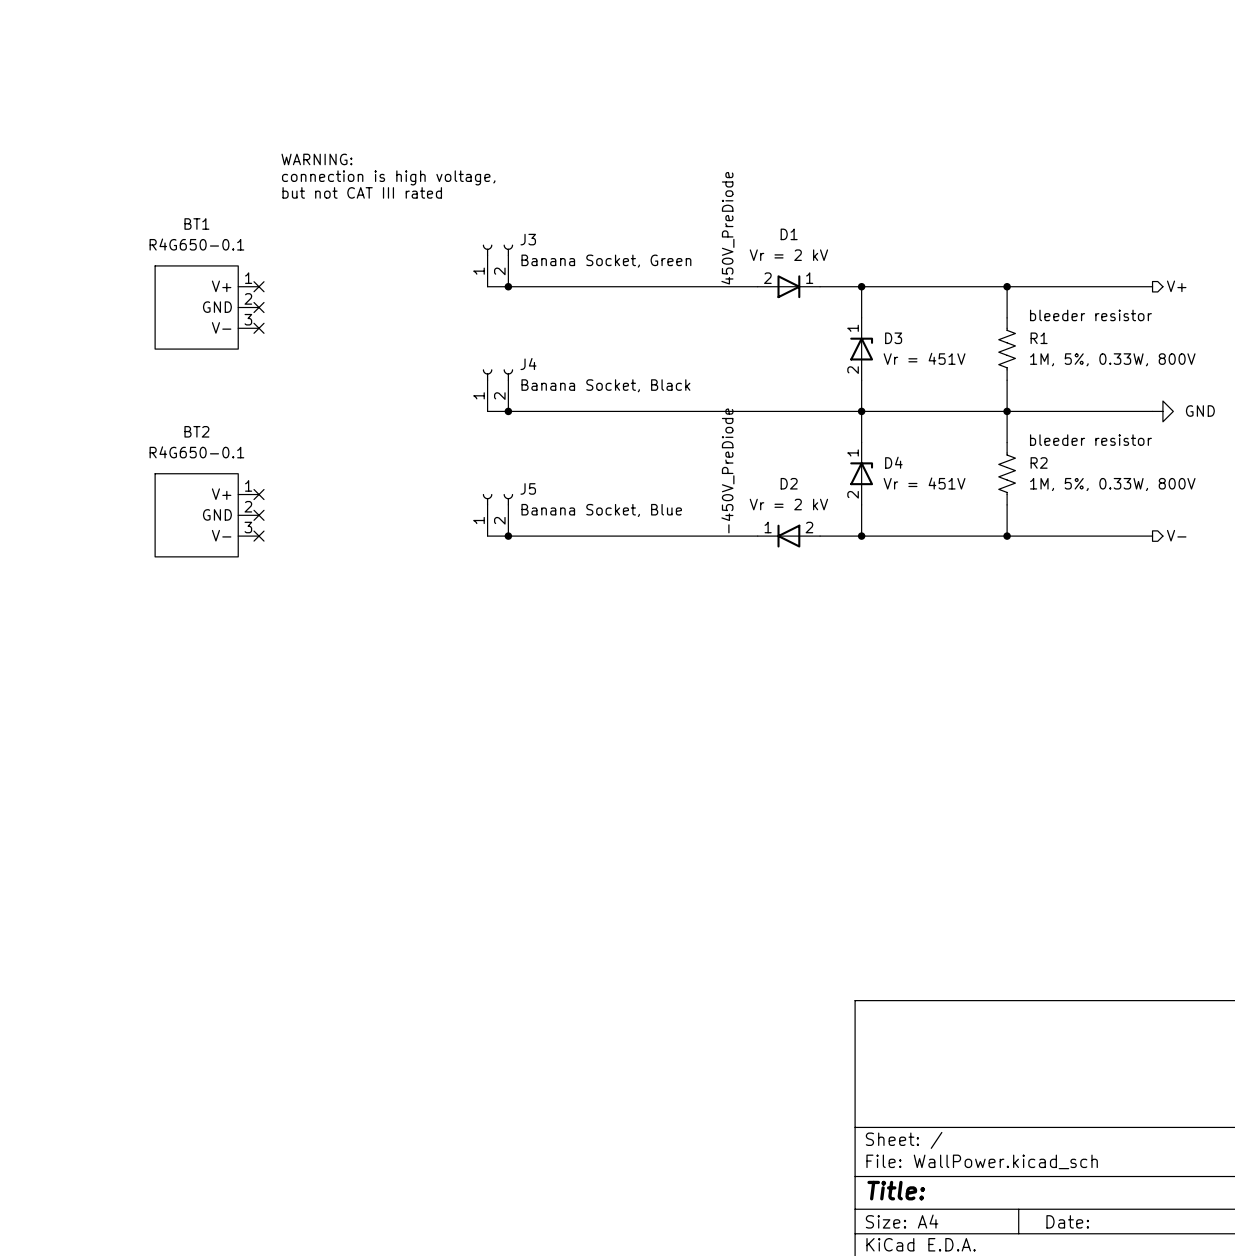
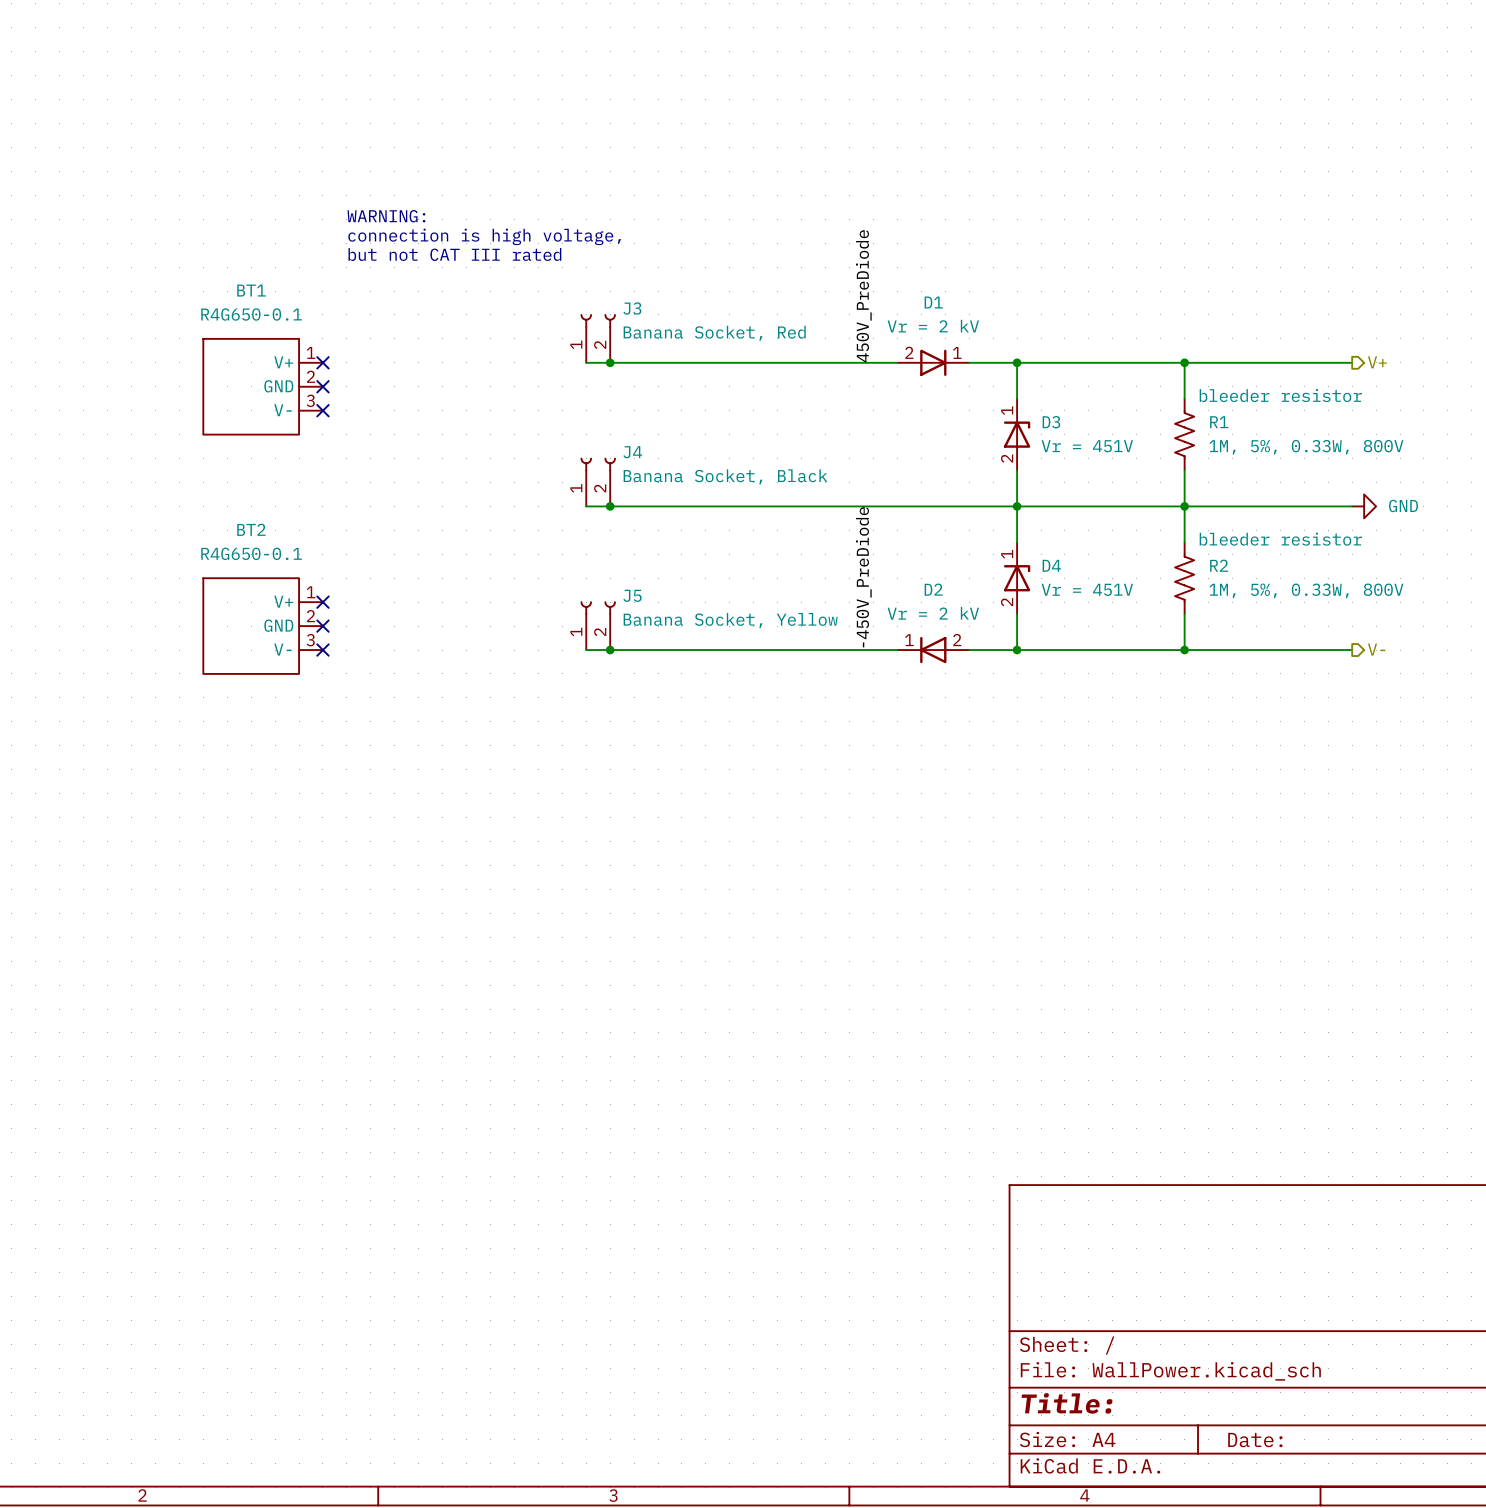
J3 value: Banana Socket, Green (606, 261) -> Banana Socket, Red (714, 333)
J5 value: Banana Socket, Blue (601, 510) -> Banana Socket, Yellow (730, 620)

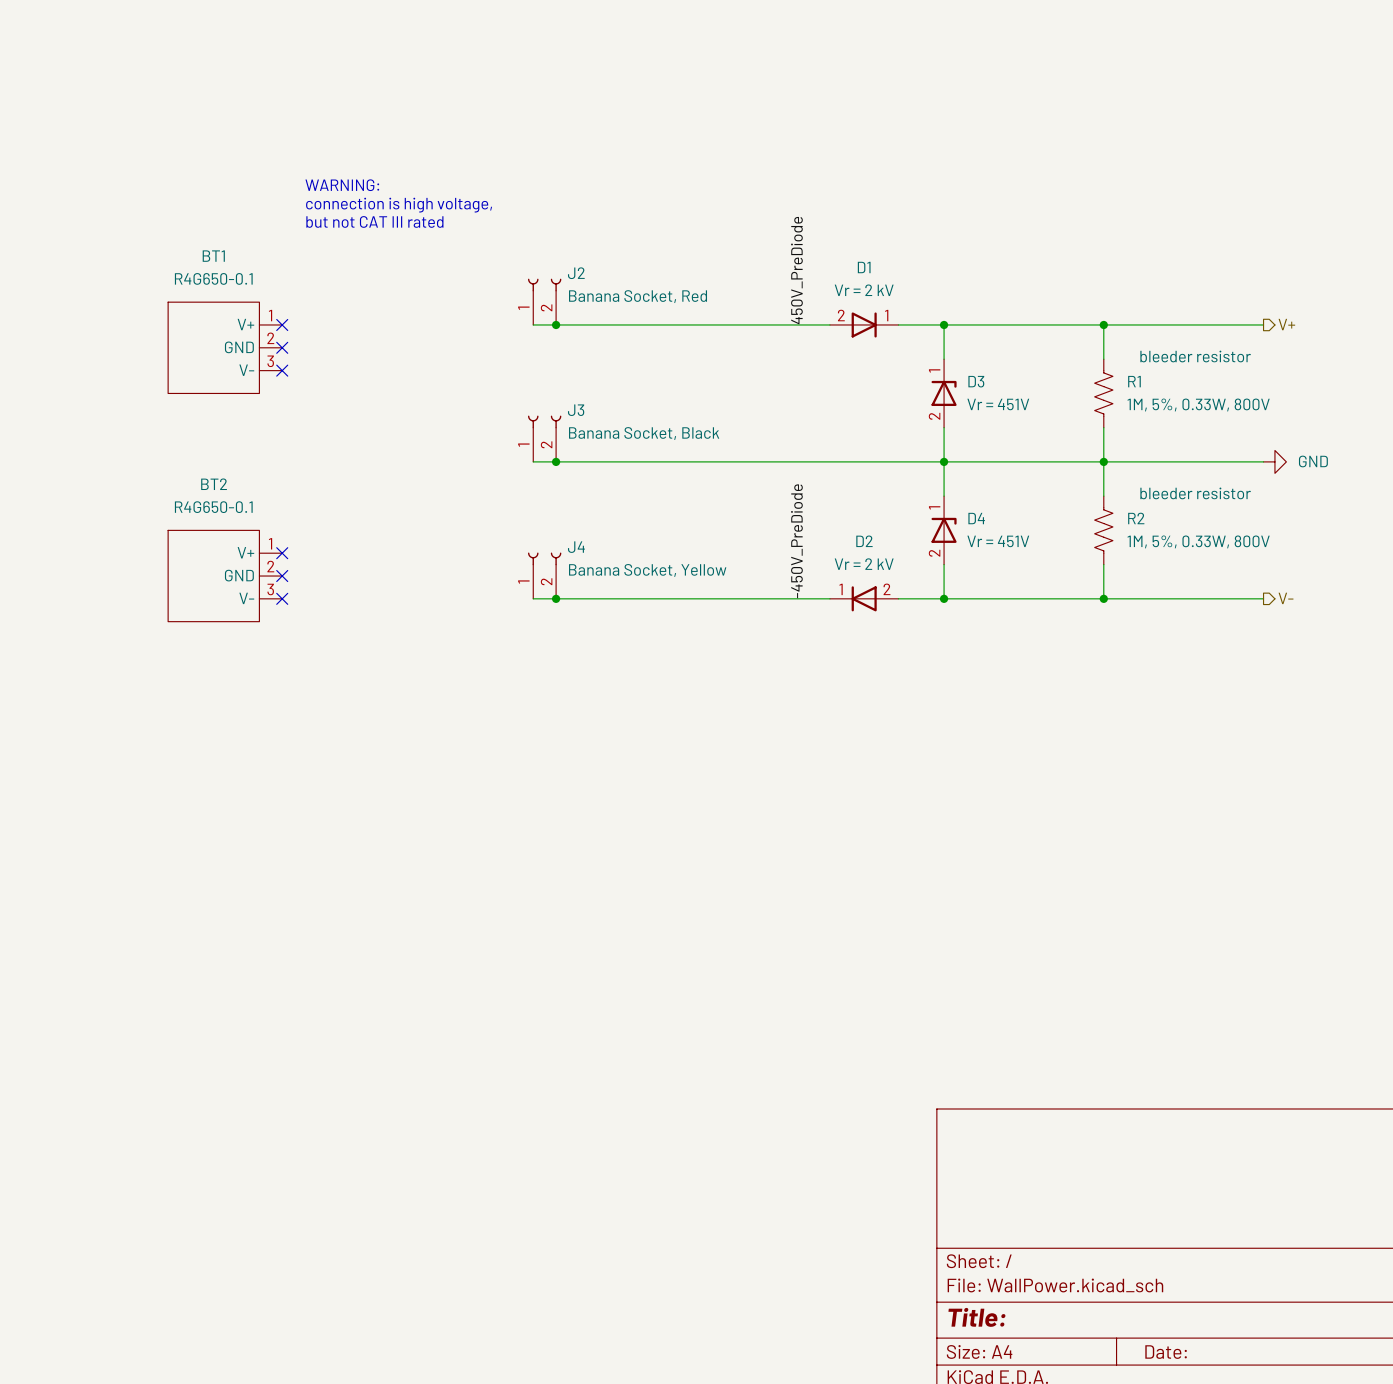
J3 name: J3 (632, 308) -> J2 (576, 273)
J4 name: J4 (632, 452) -> J3 (576, 410)
J5 name: J5 (632, 595) -> J4 (576, 547)

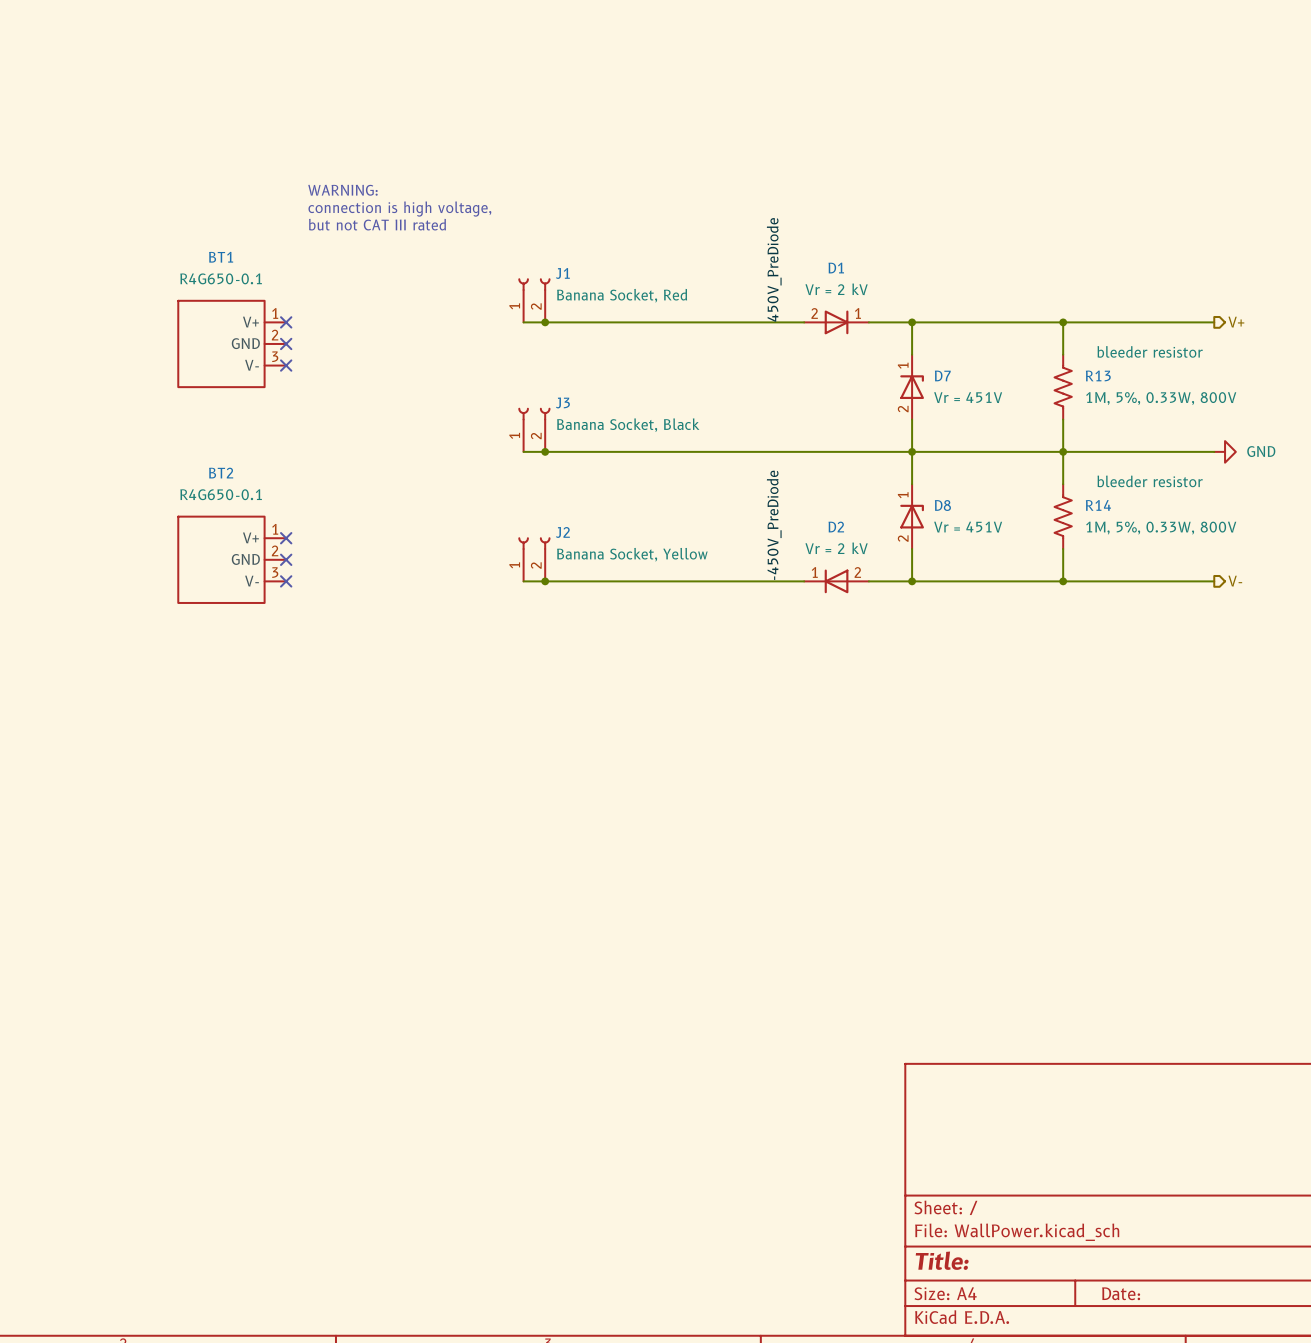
J2 name: J2 (576, 273) -> J1 (562, 273)
D3 name: D3 (976, 381) -> D7 (942, 375)
R1 name: R1 (1134, 381) -> R13 (1098, 375)
D4 name: D4 (976, 518) -> D8 (942, 505)
R2 name: R2 (1136, 518) -> R14 (1098, 505)
J4 name: J4 (576, 547) -> J2 (562, 532)

